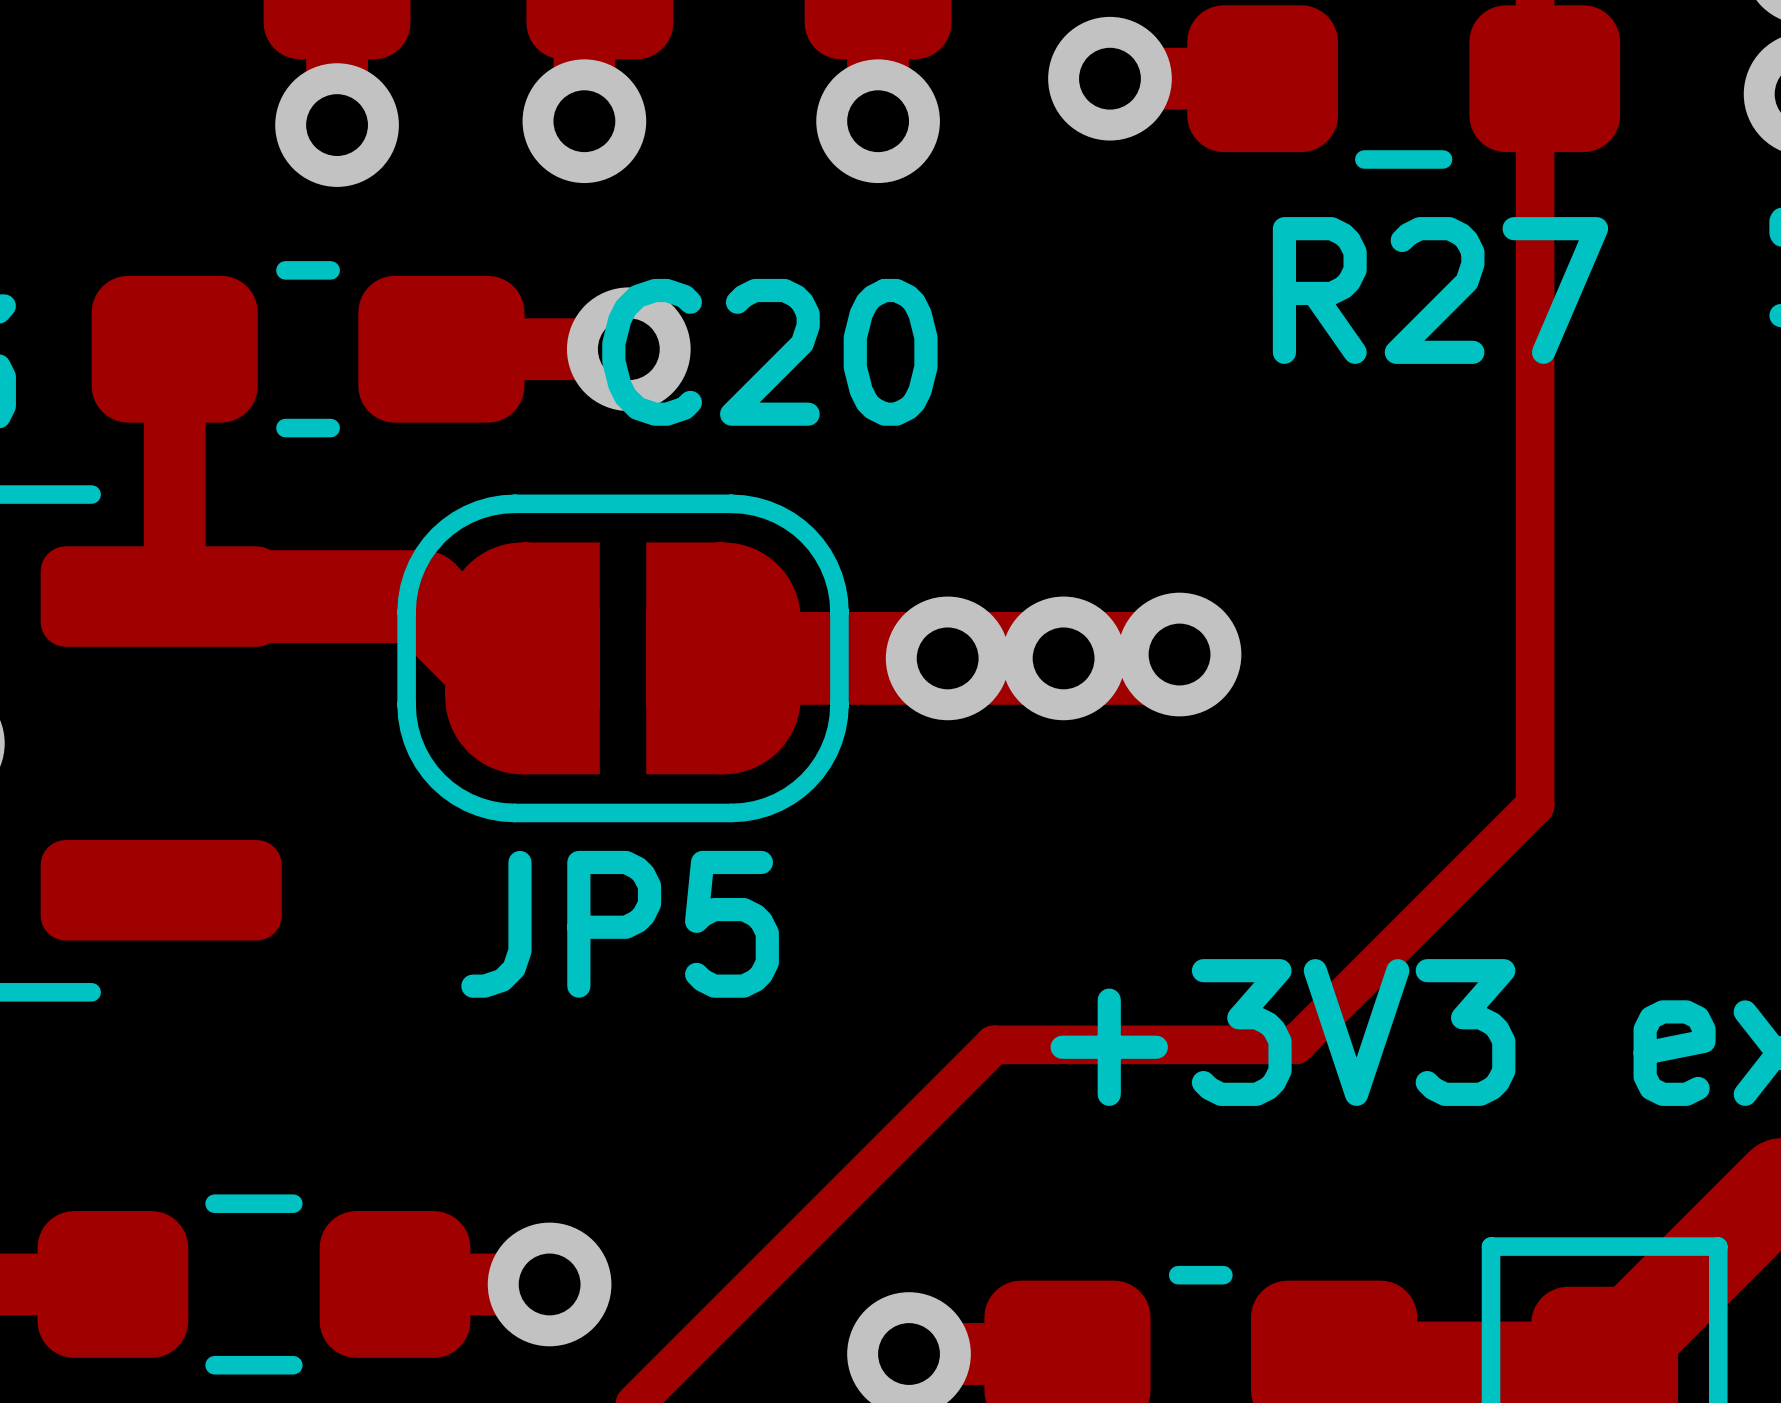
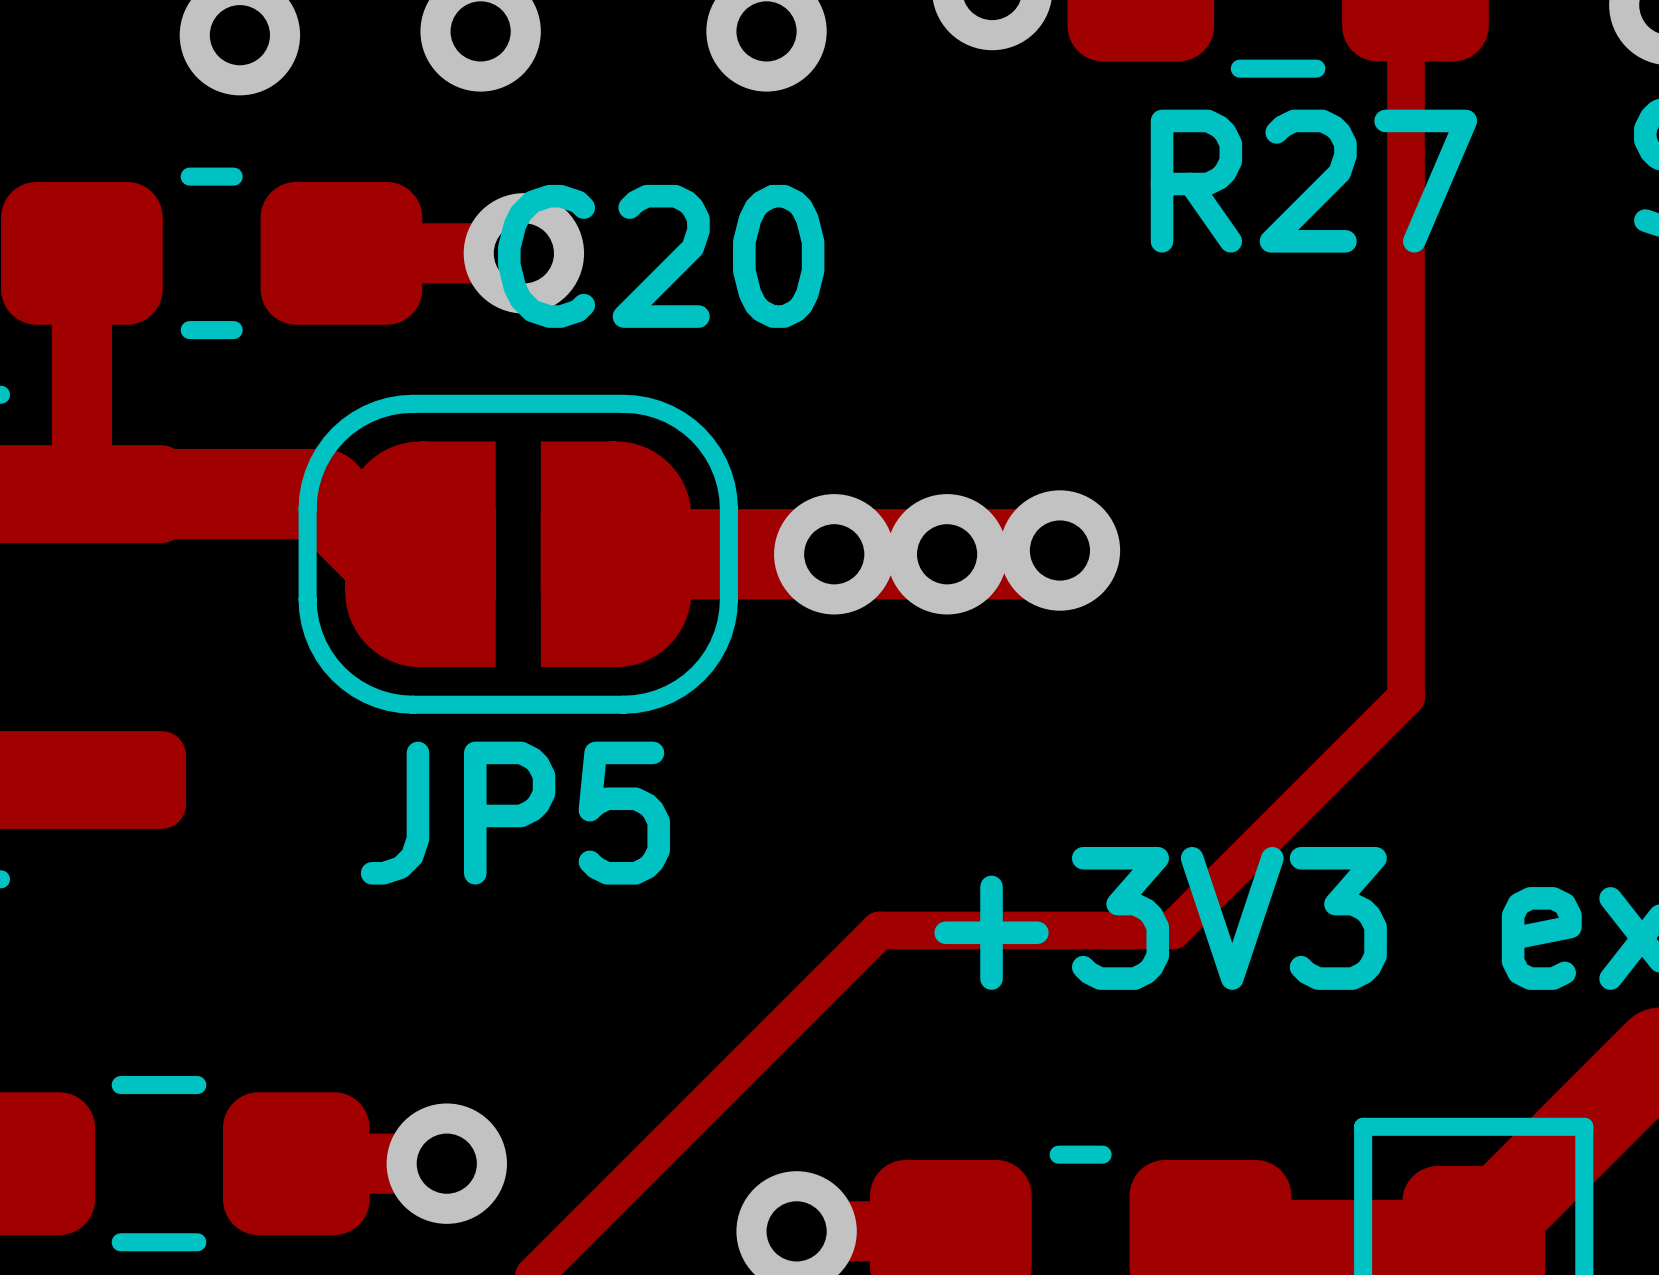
R27 name position: R27 (1440, 290) -> R27 (1313, 181)

